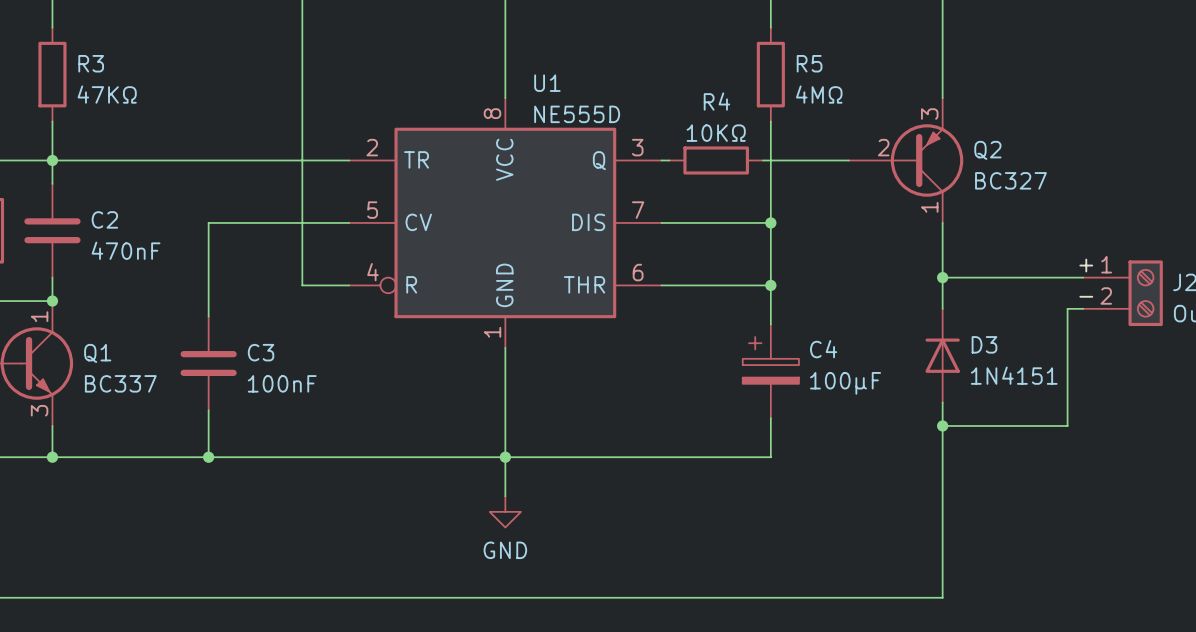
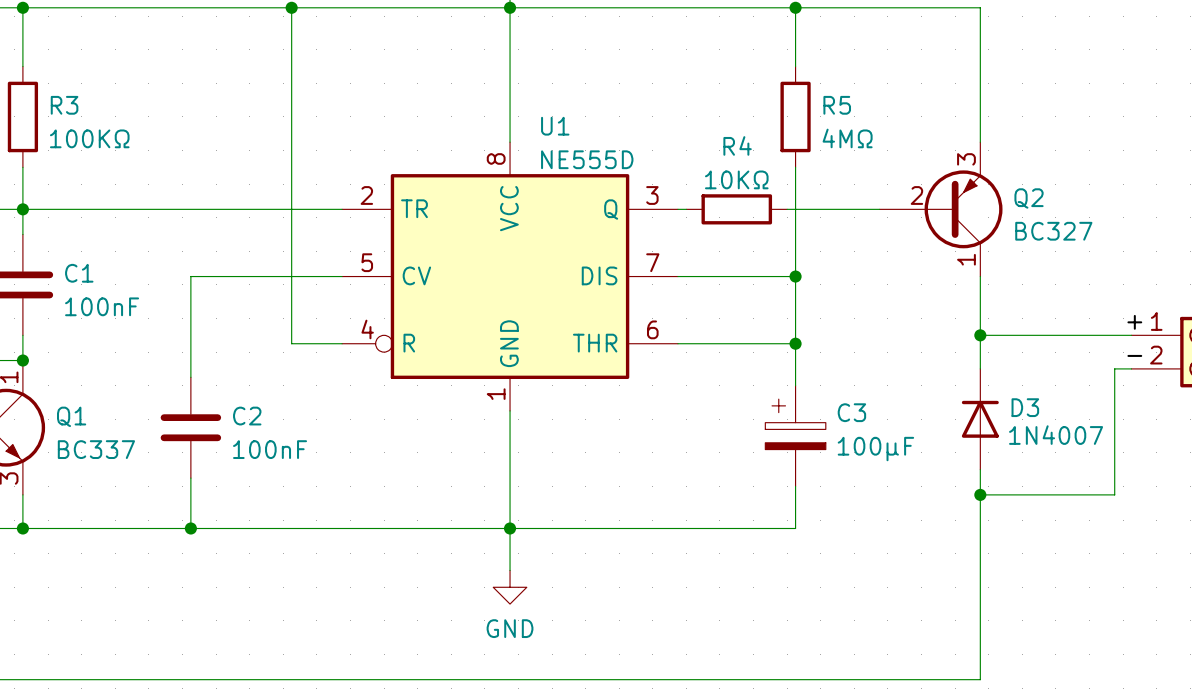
R3 value: 47KΩ (107, 94) -> 100KΩ (89, 138)
C2 name: C2 (104, 219) -> C1 (79, 273)
C2 value: 470nF (126, 250) -> 100nF (102, 306)
C4 name: C4 (823, 349) -> C3 (851, 412)
C3 name: C3 (261, 352) -> C2 (247, 416)
D3 value: 1N4151 (1014, 375) -> 1N4007 (1056, 435)

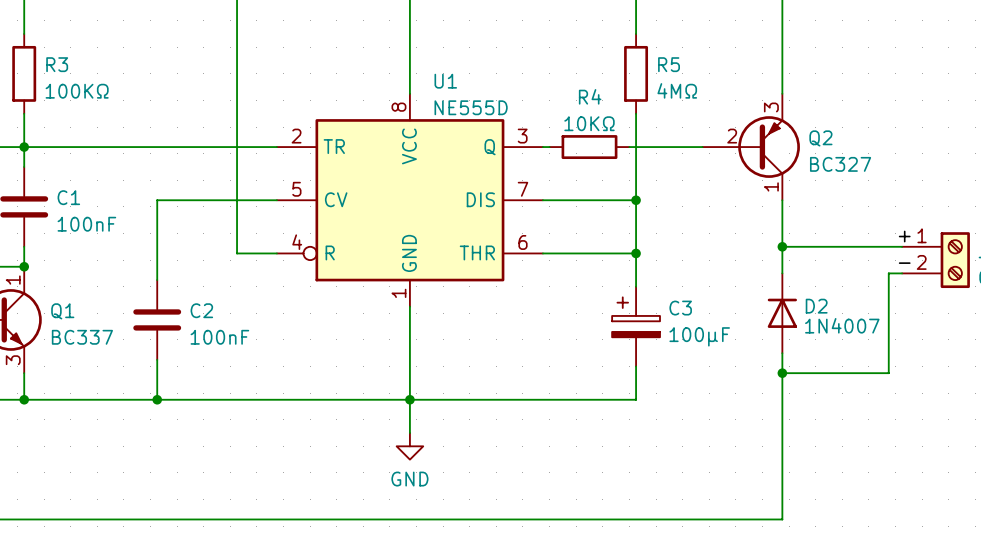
D3 name: D3 (1025, 407) -> D2 (816, 306)

